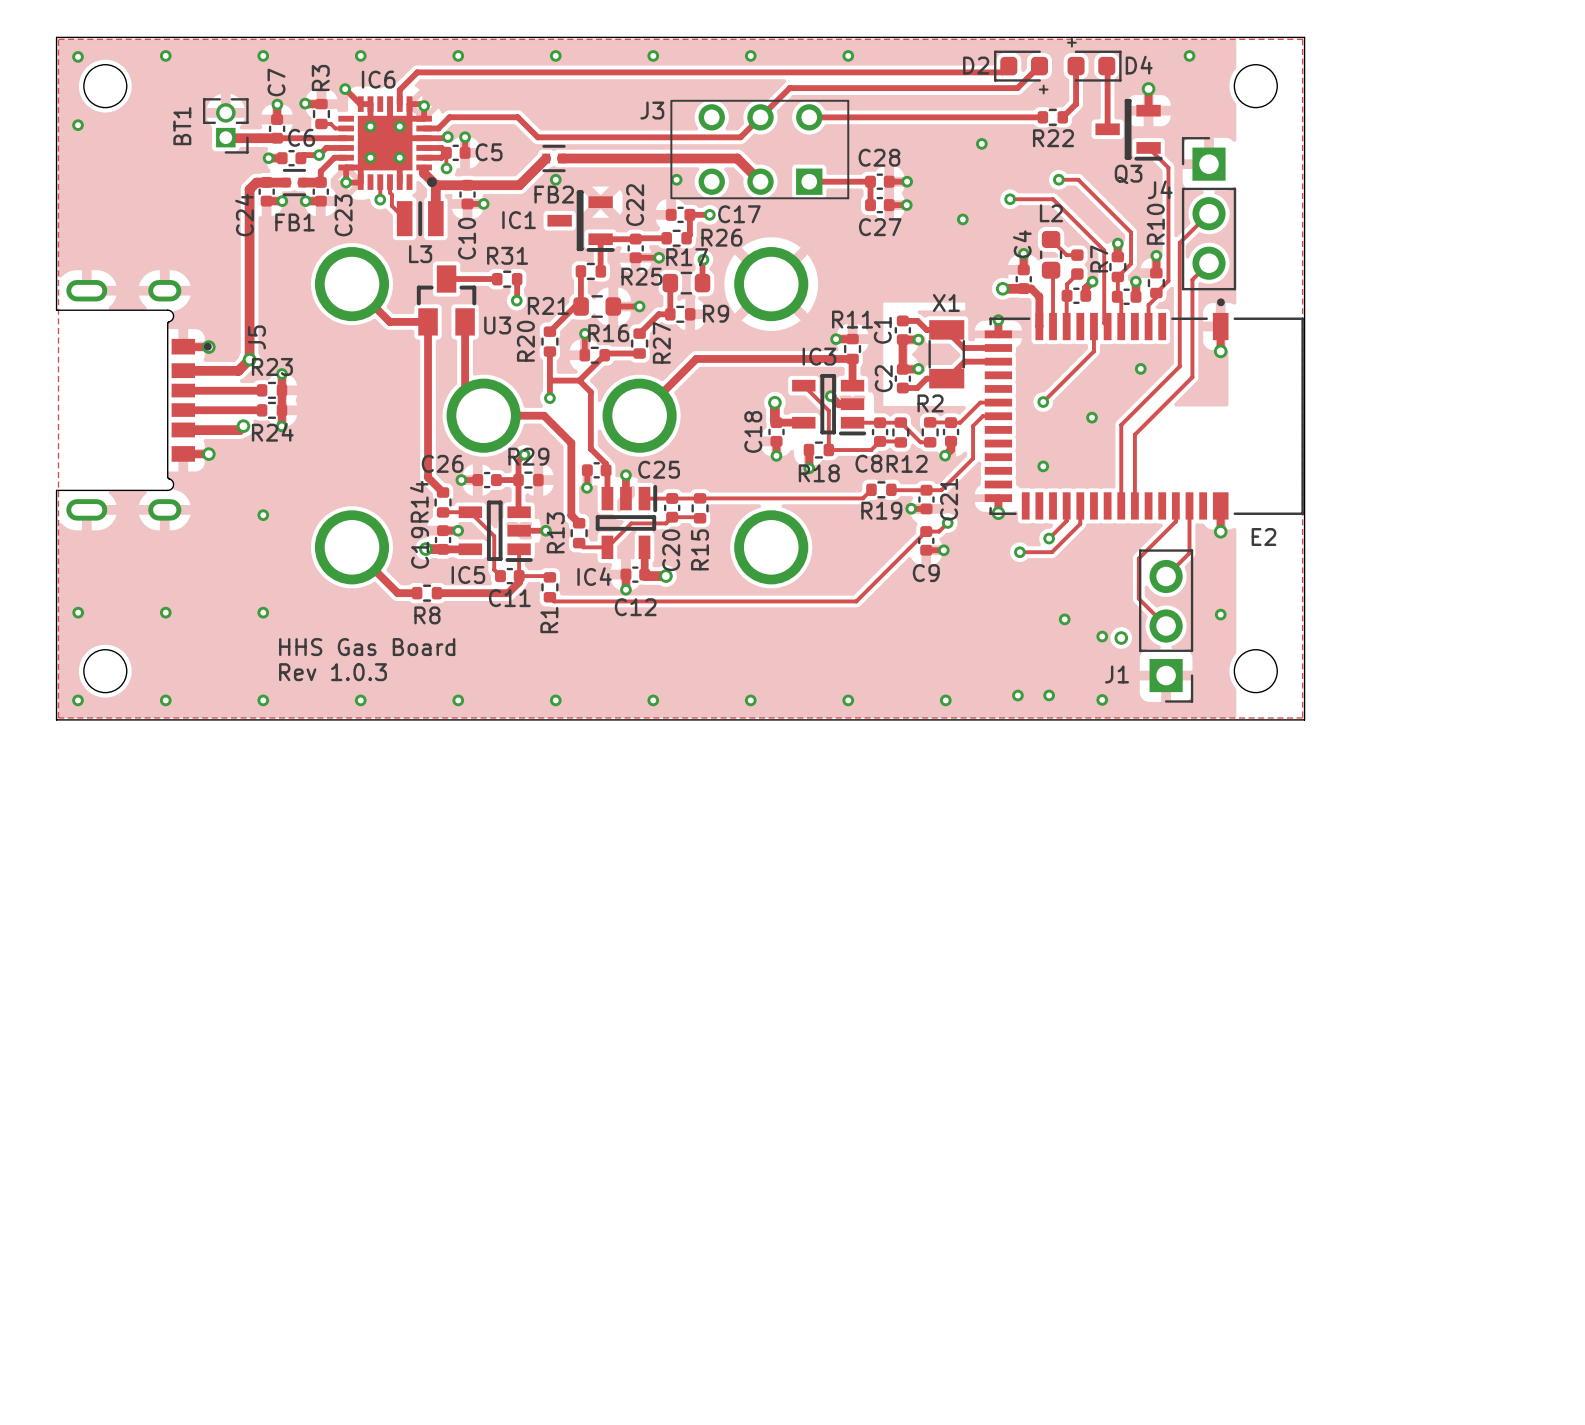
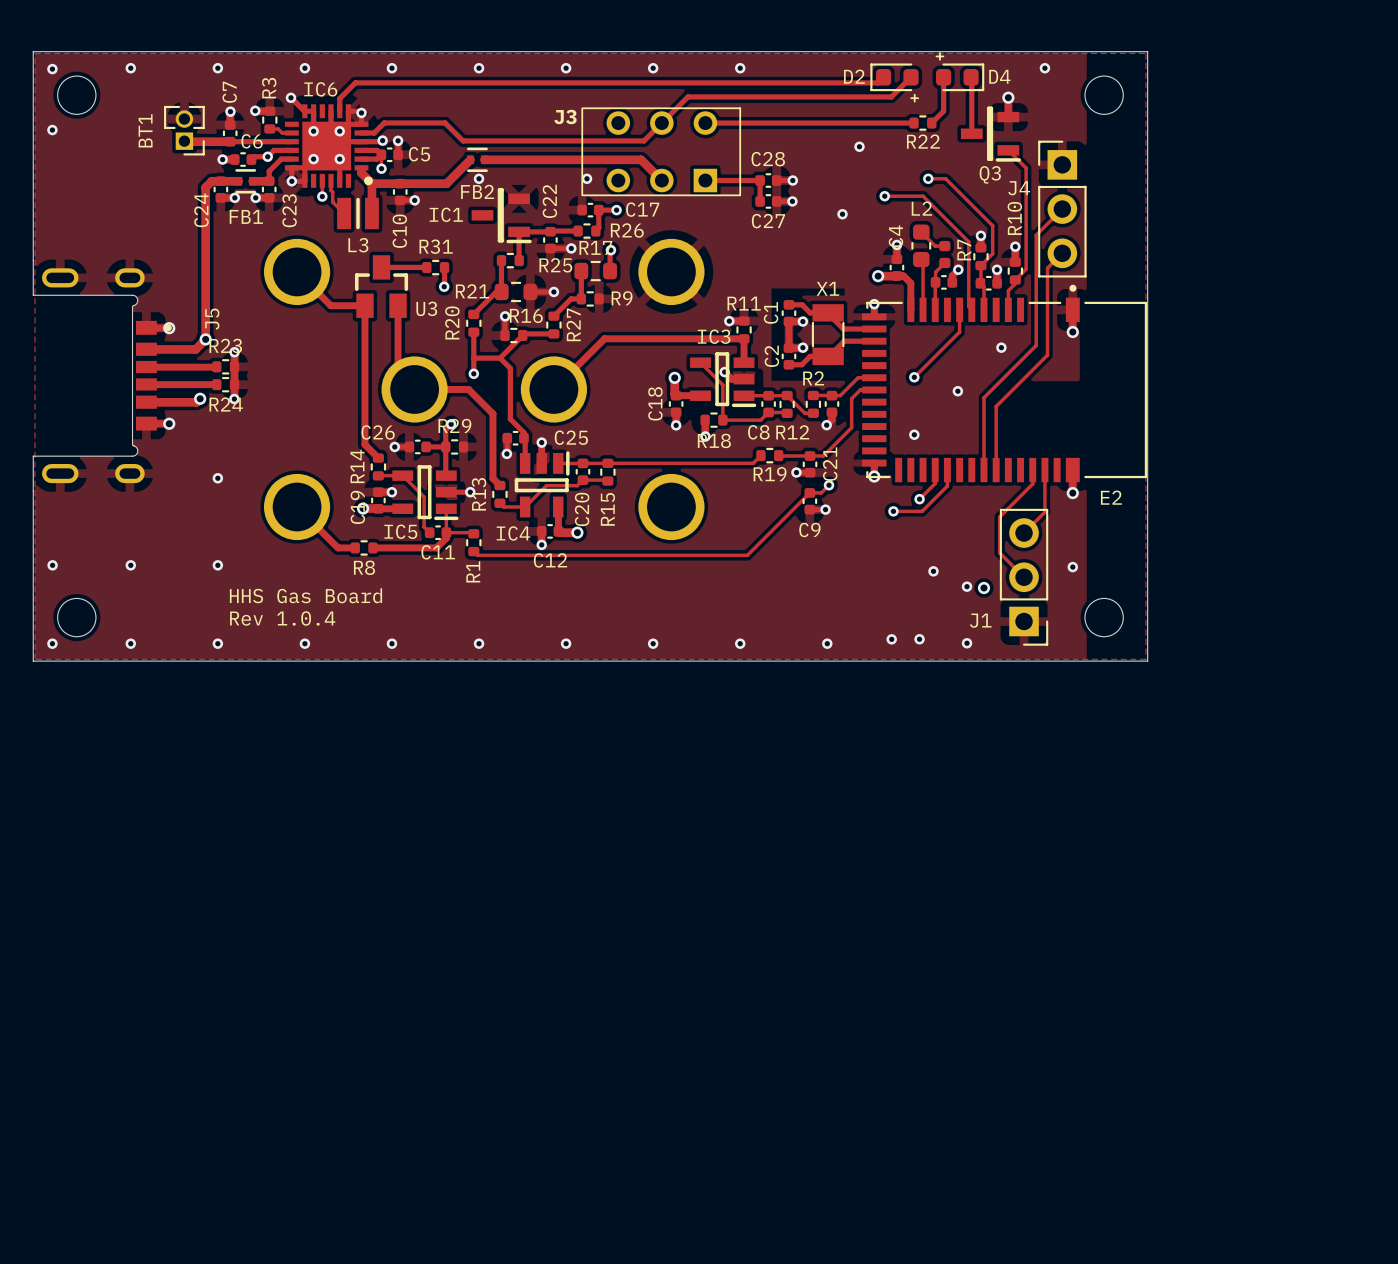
text: Rev 1.0.3 (333, 672) -> Rev 1.0.4 (282, 618)

